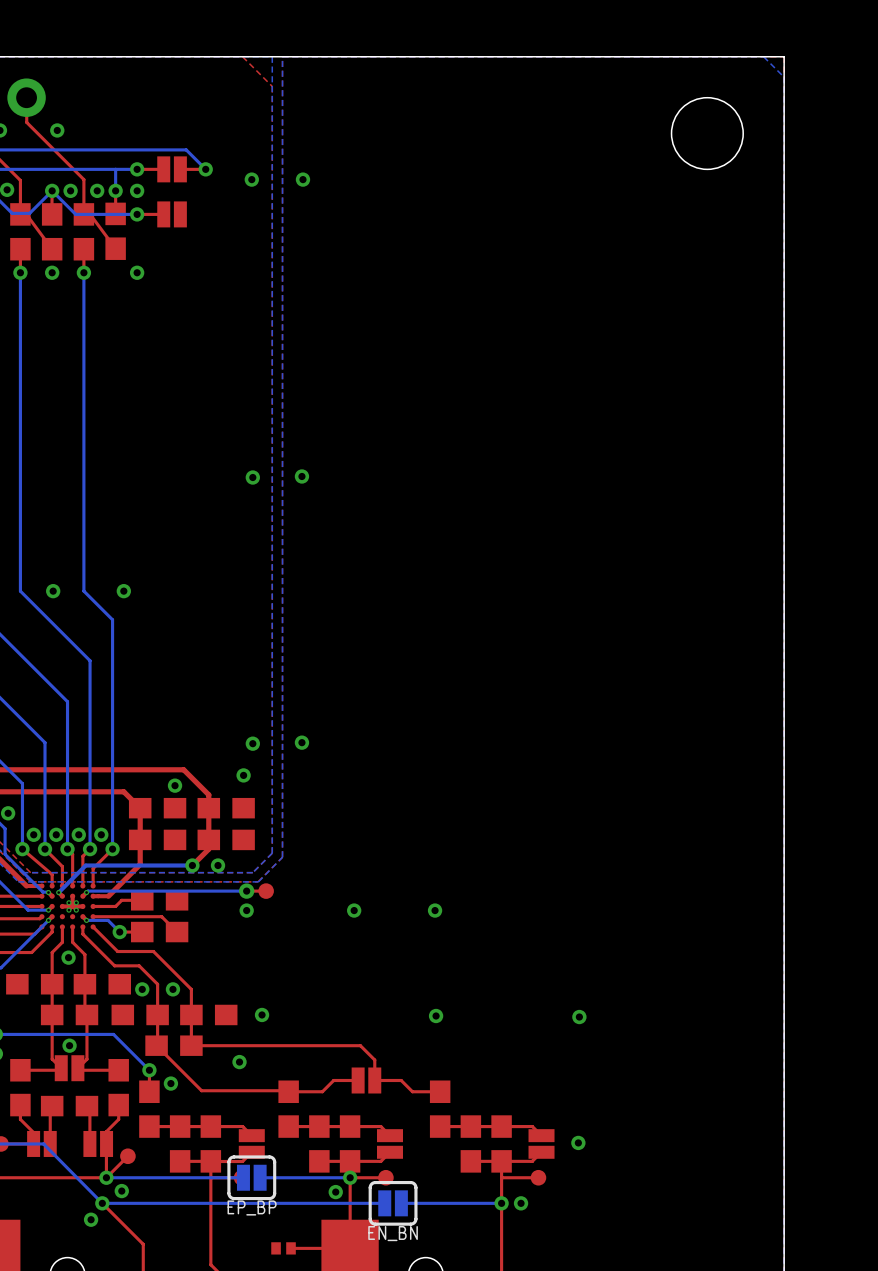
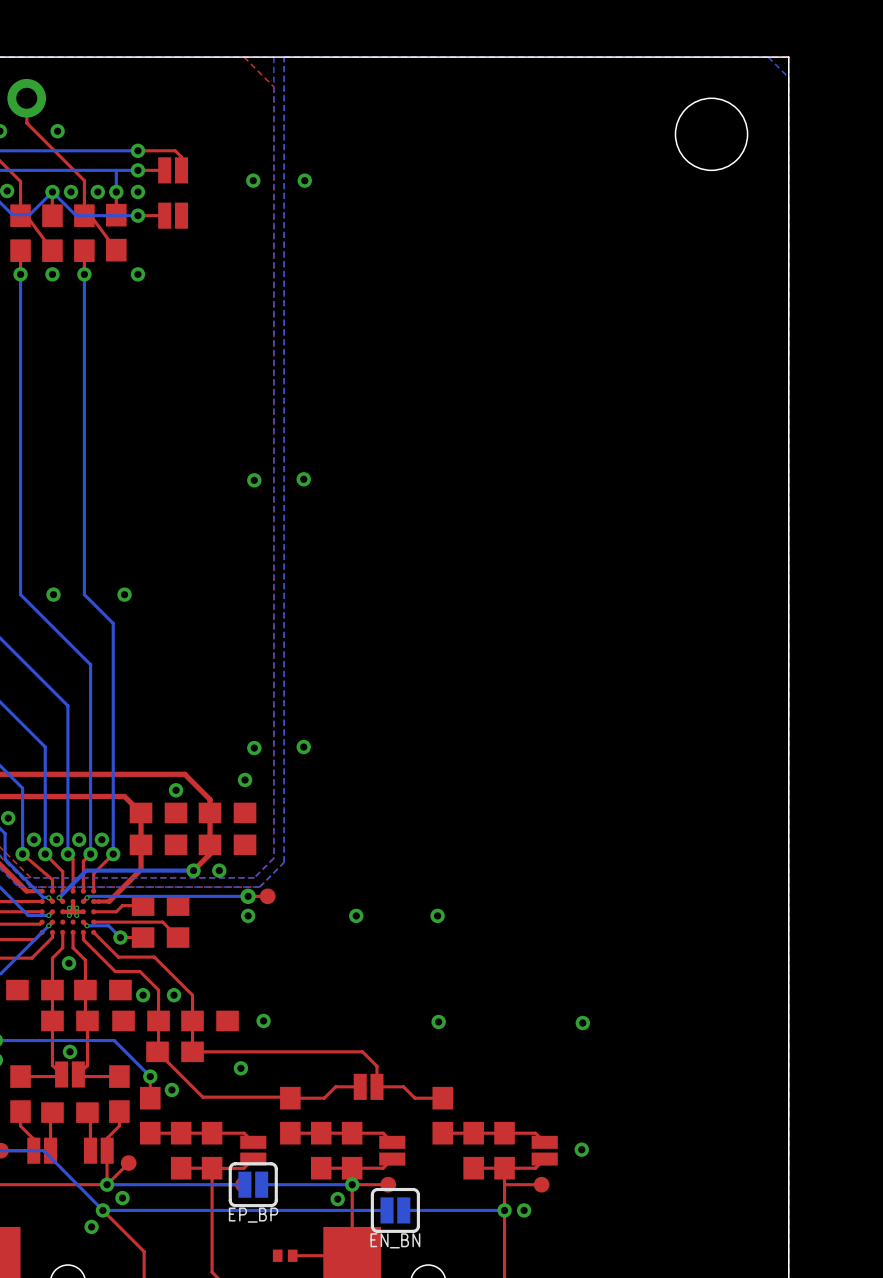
bottom track: (137, 149) (186, 149) (205, 169) -> none
top track: (205, 169) (180, 169) -> (137, 150) (175, 150) (181, 156) (181, 170)
via position: (205, 169) -> (137, 150)

